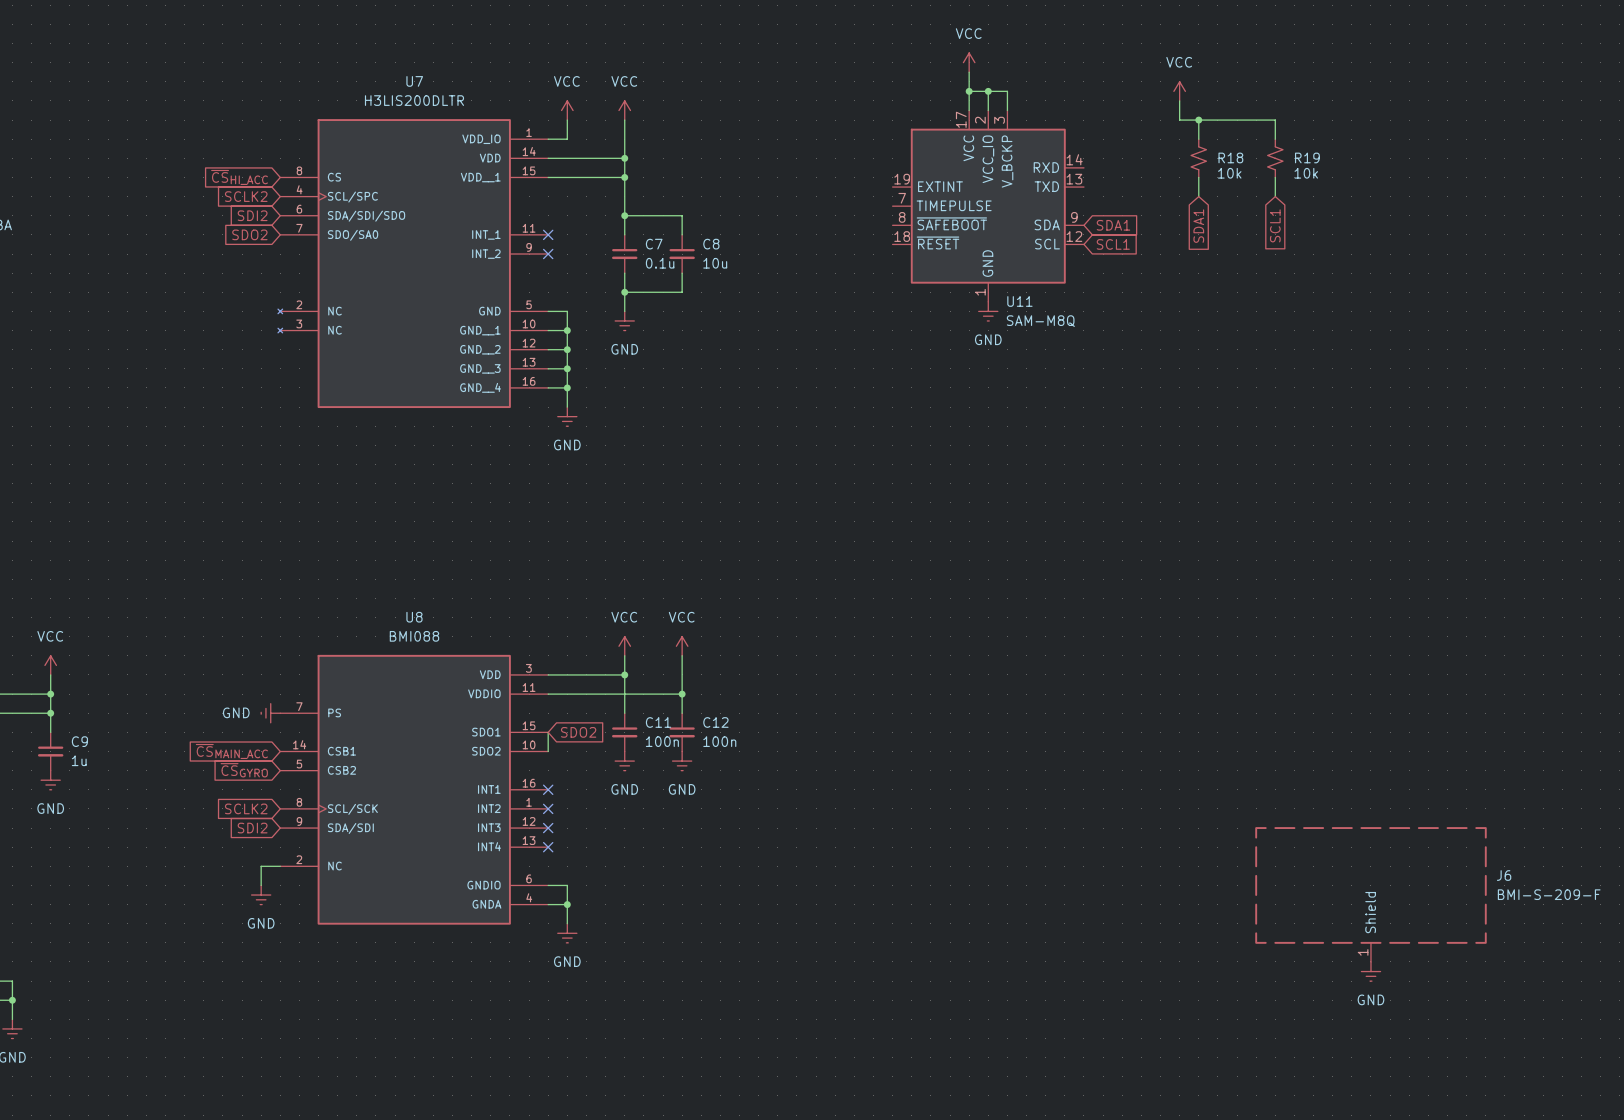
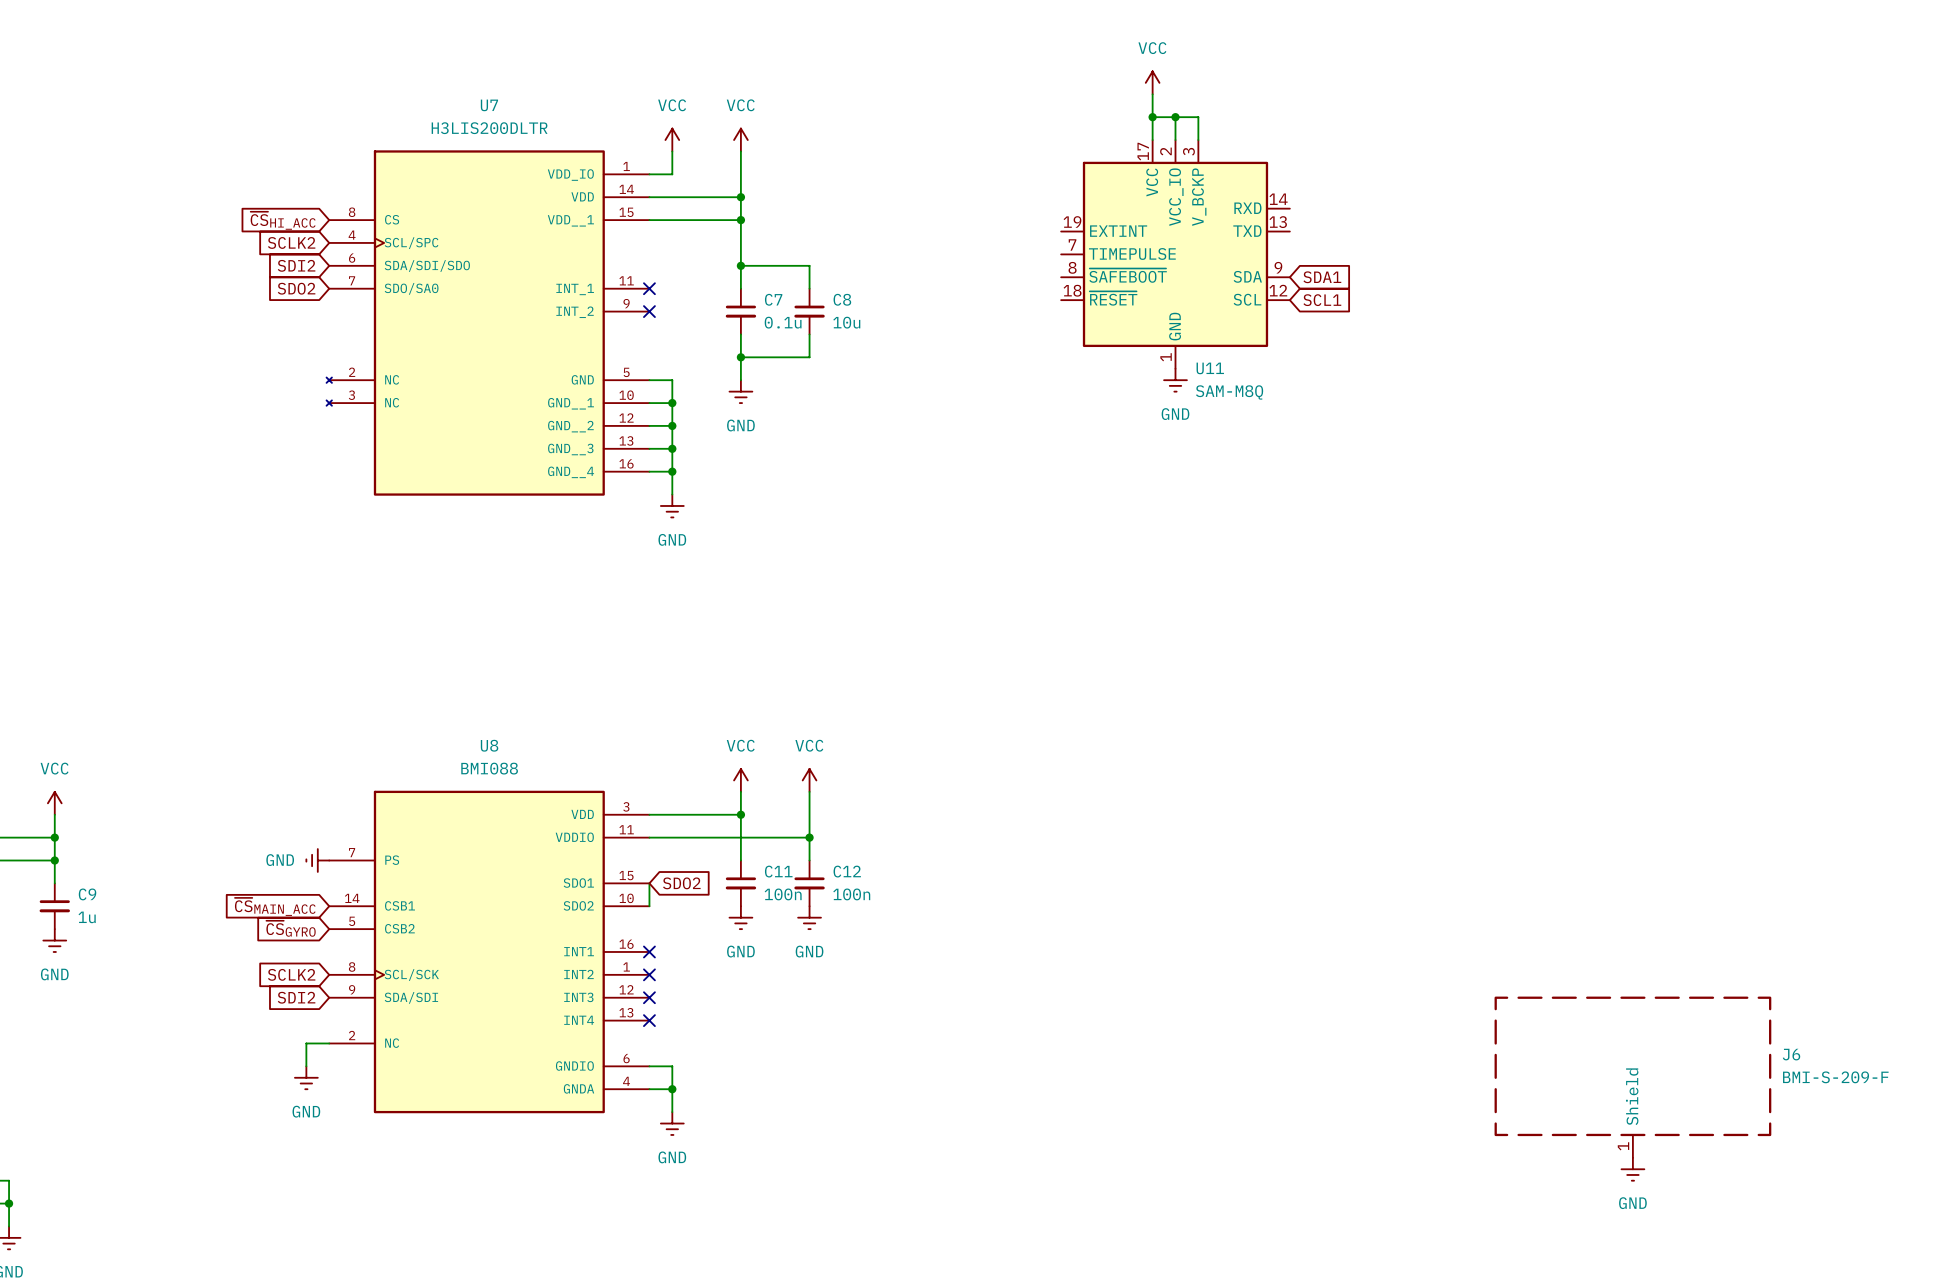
power symbol: VCC (1179, 91) -> none
wire: (1179, 100) (1179, 120) (1275, 120) (1275, 139) -> none
wire: (1198, 120) (1198, 139) -> none
junction: (1198, 120) -> none
R18: 10k (1198, 158) -> none
R19: 10k (1275, 158) -> none
wire: (1198, 177) (1198, 196) -> none
wire: (1275, 177) (1275, 196) -> none
global label: SCL1 (1275, 225) -> none
global label: SDA1 (1198, 226) -> none

